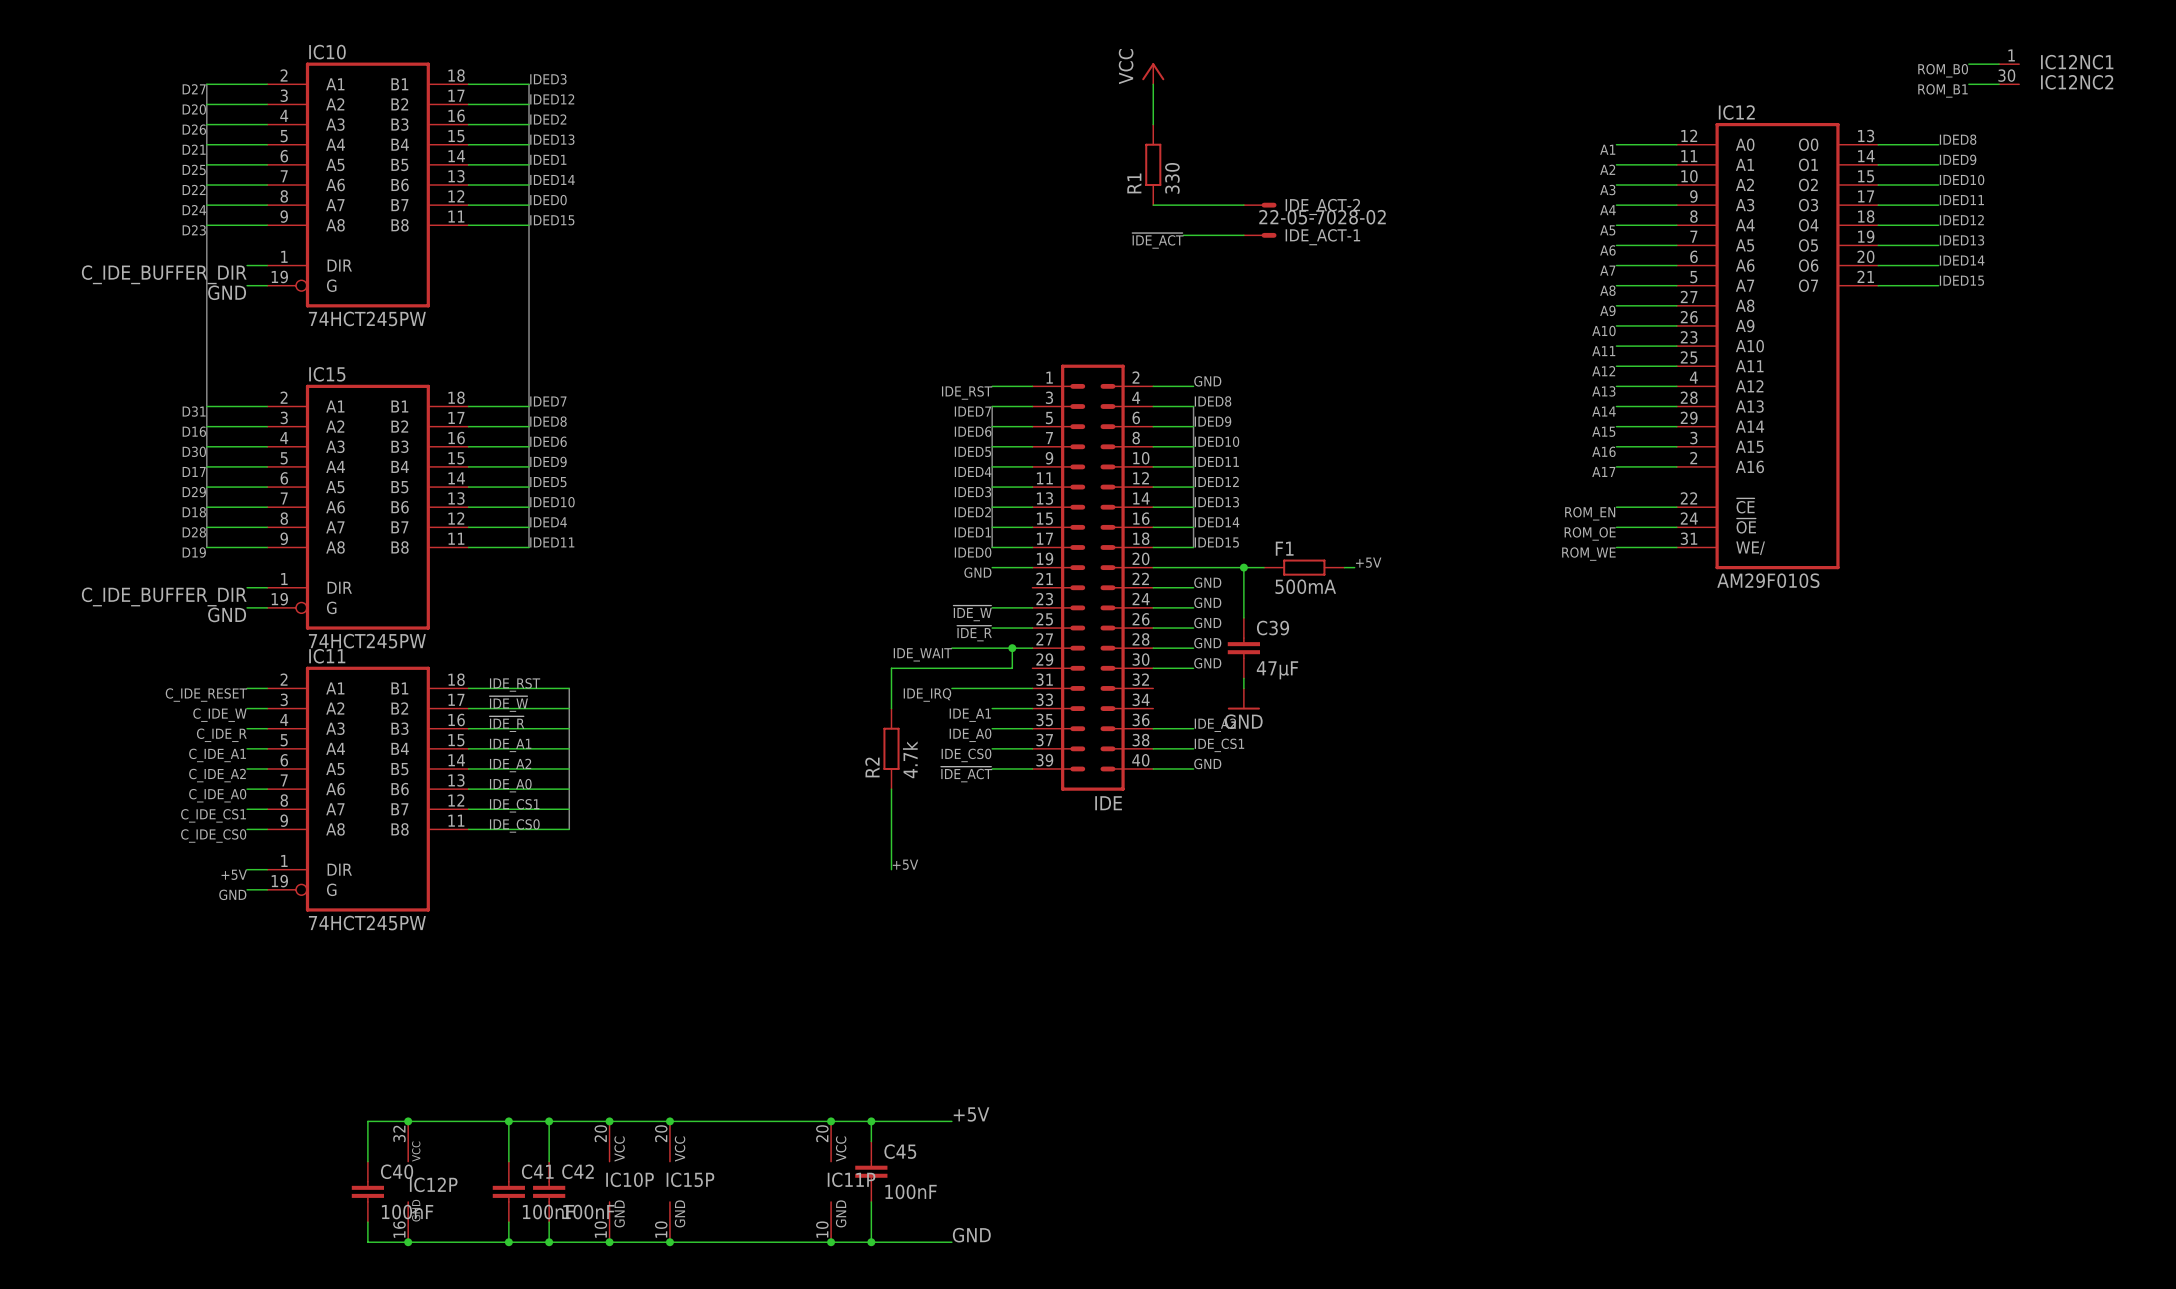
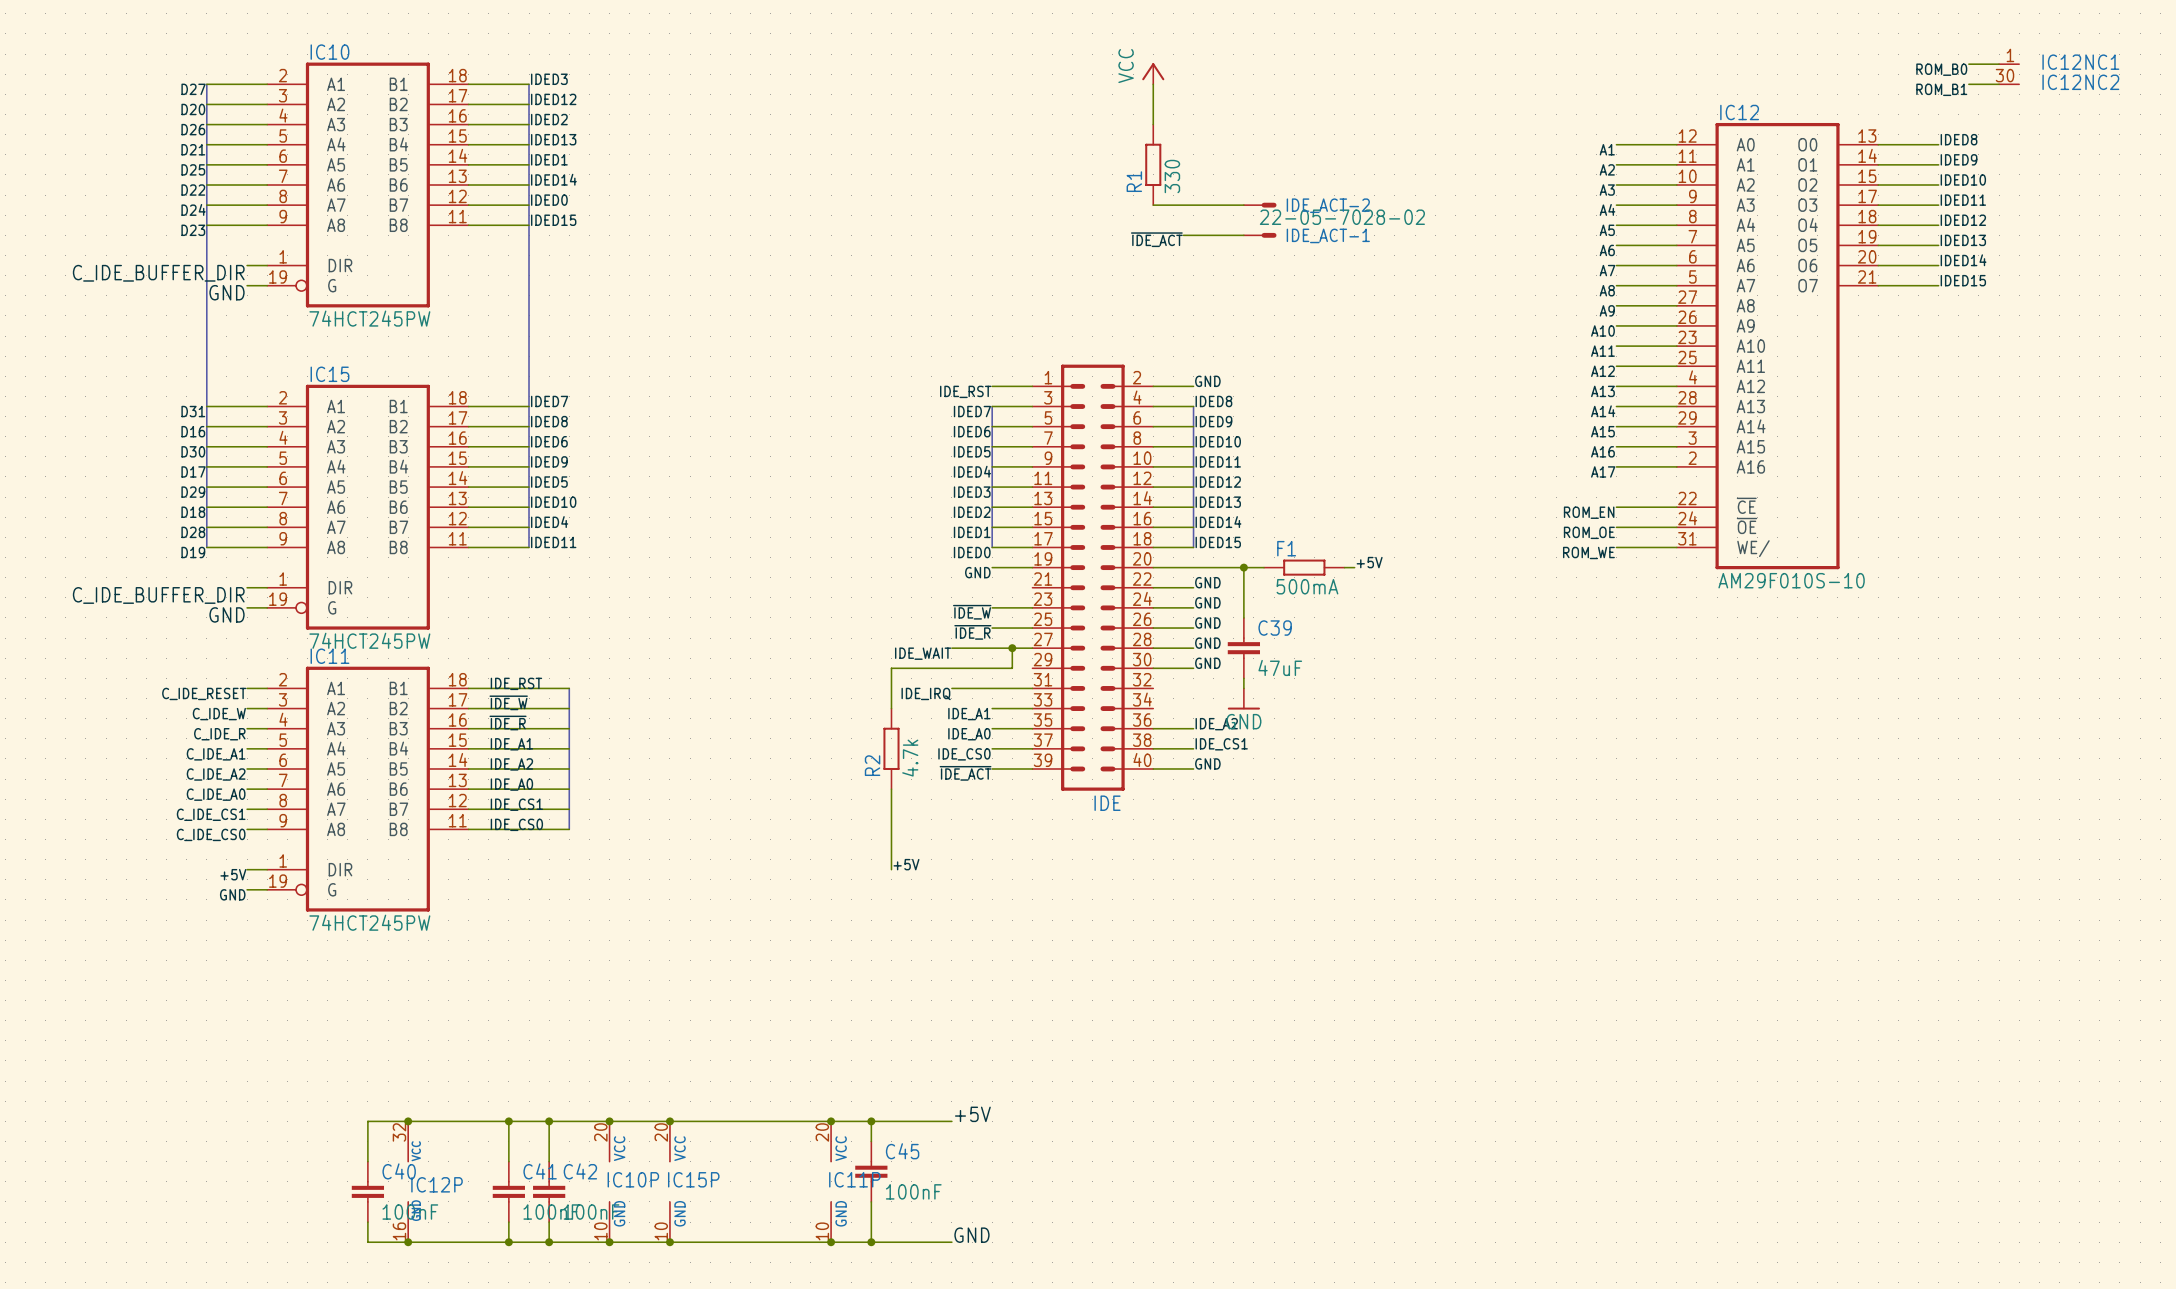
IC12 value: AM29F010S (1768, 580) -> AM29F010S-10 (1791, 580)
C39 value: 47µF (1277, 670) -> 47uF (1280, 667)

